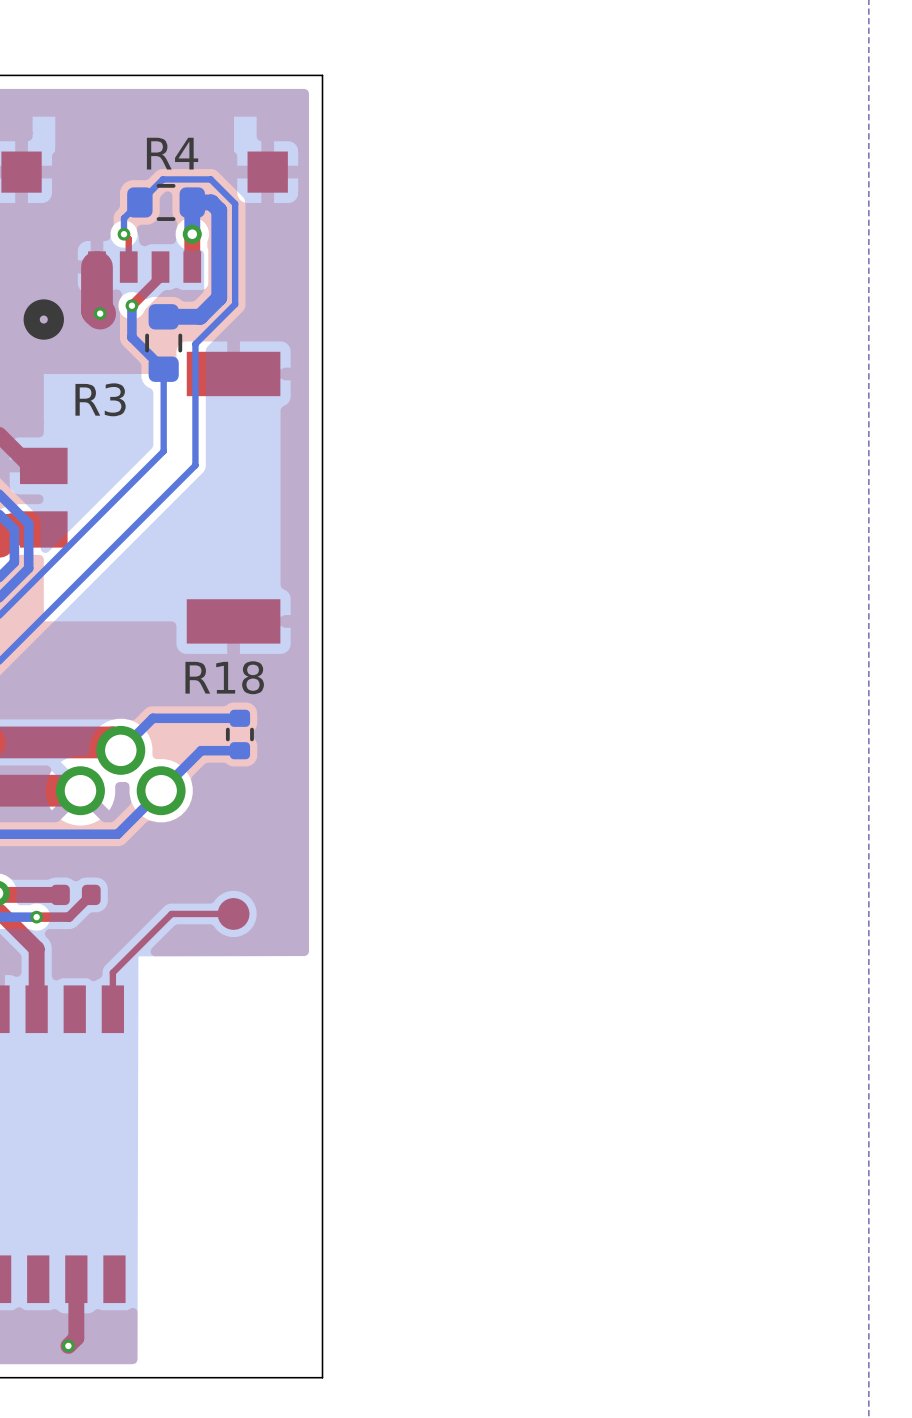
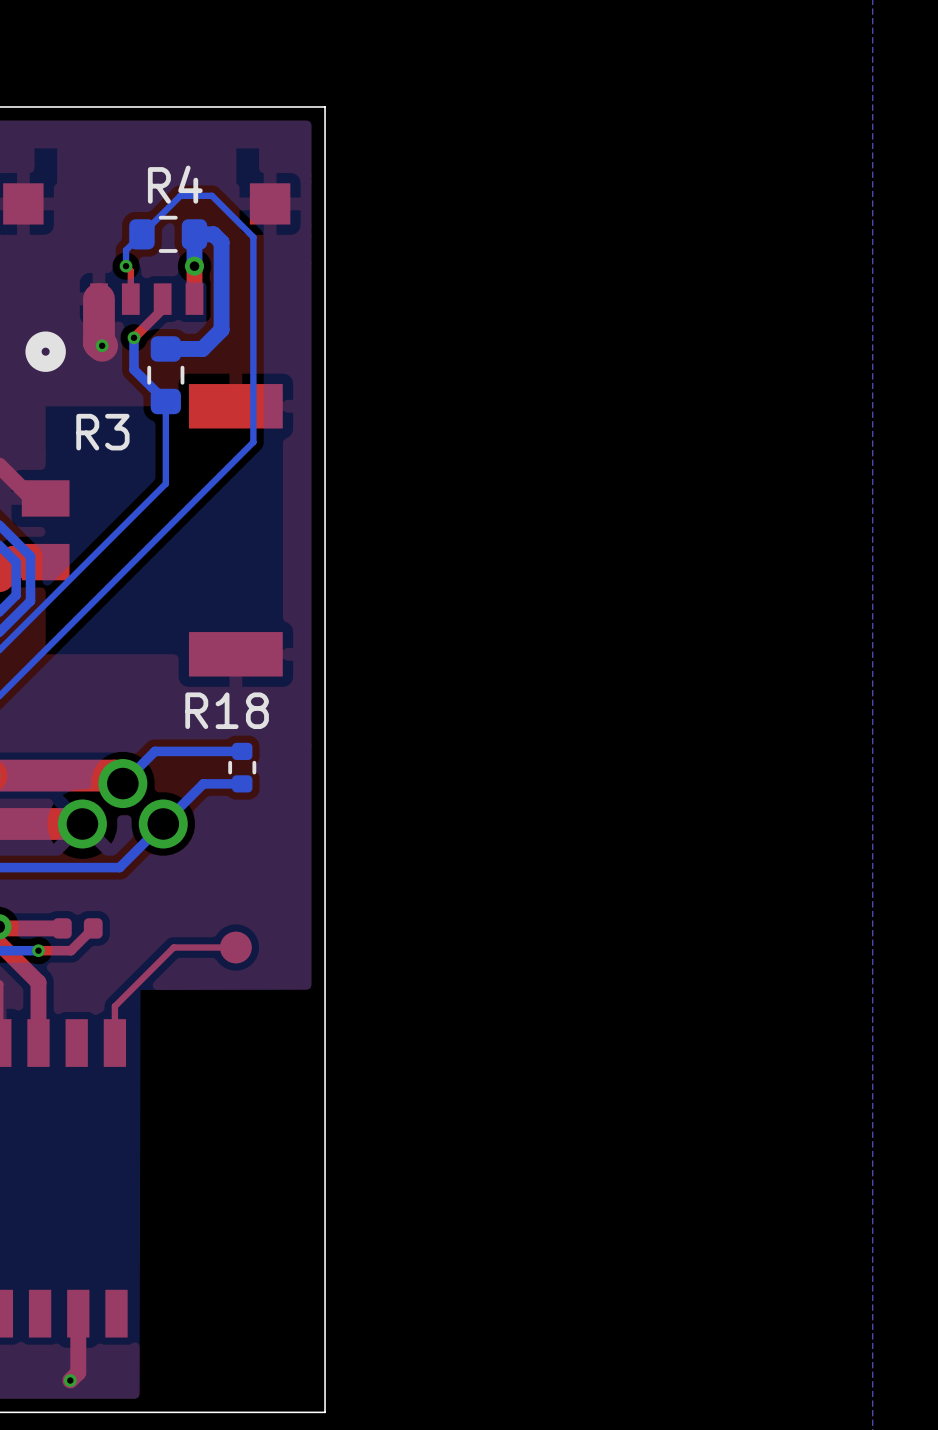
bottom track: (162, 179) (210, 179) (235, 203) (235, 304) (195, 344) (195, 465) -> (165, 211) (180, 195) (212, 195) (253, 237) (253, 442) (197, 497)

